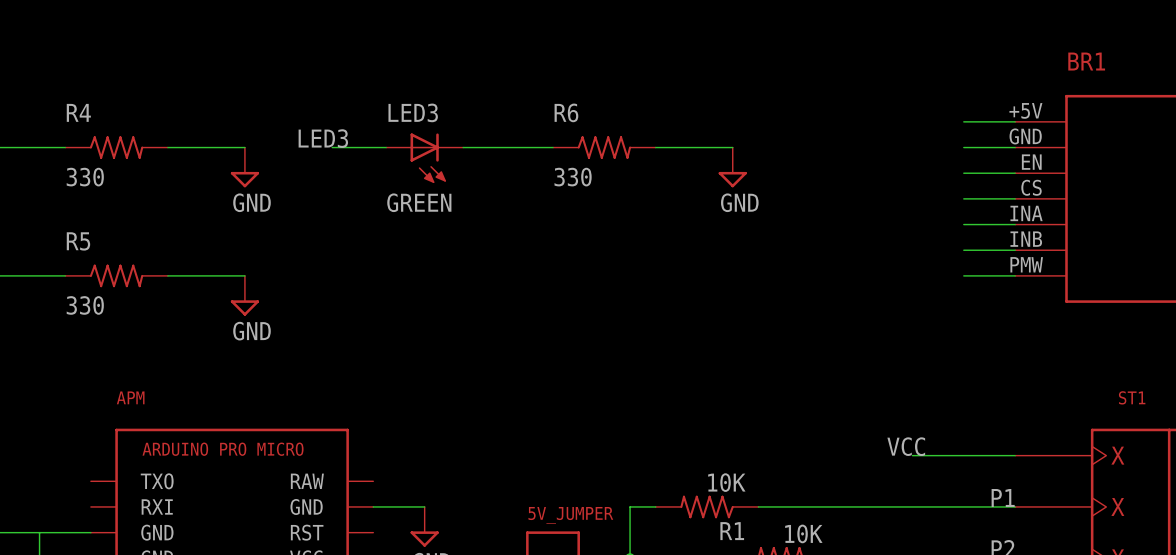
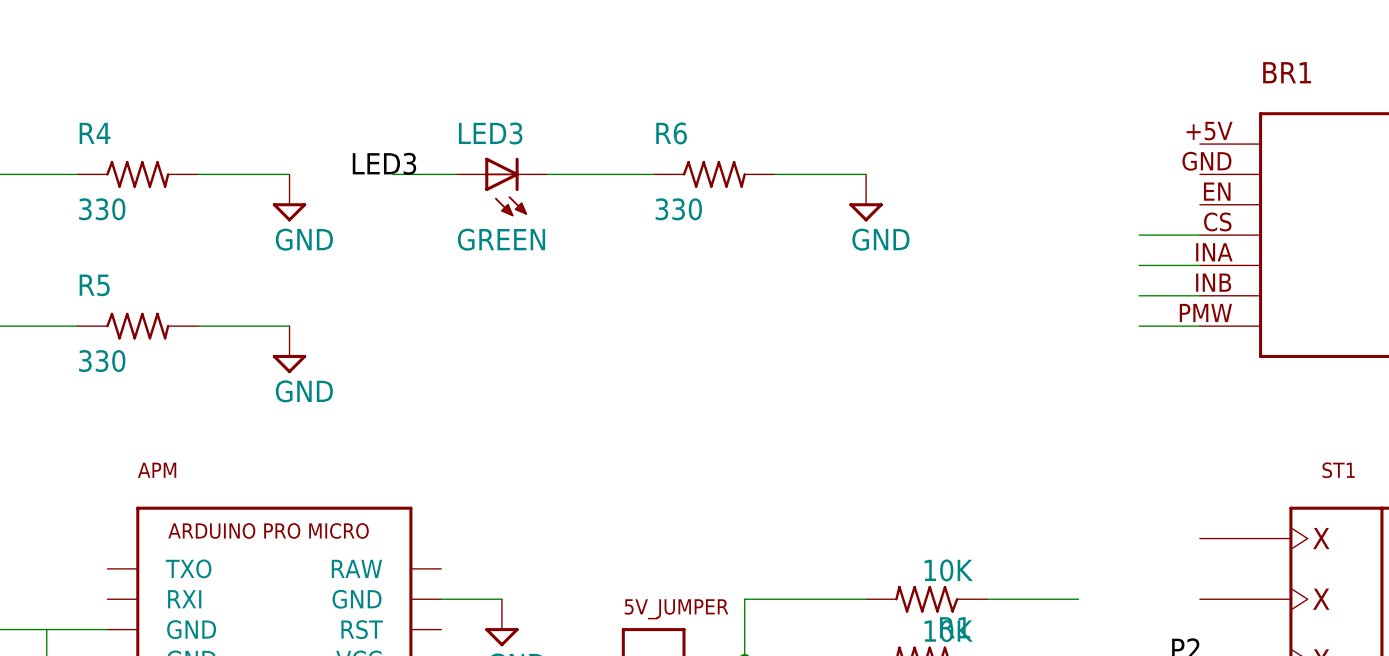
wire: (963, 121) (1015, 121) -> none
wire: (963, 147) (1015, 147) -> none
wire: (963, 173) (1015, 173) -> none
label: VCC (906, 446) -> none
wire: (912, 455) (1015, 455) -> none
label: P1 (1003, 497) -> none
R1 position: (707, 506) -> (926, 599)
wire: (912, 506) (1015, 506) -> none

